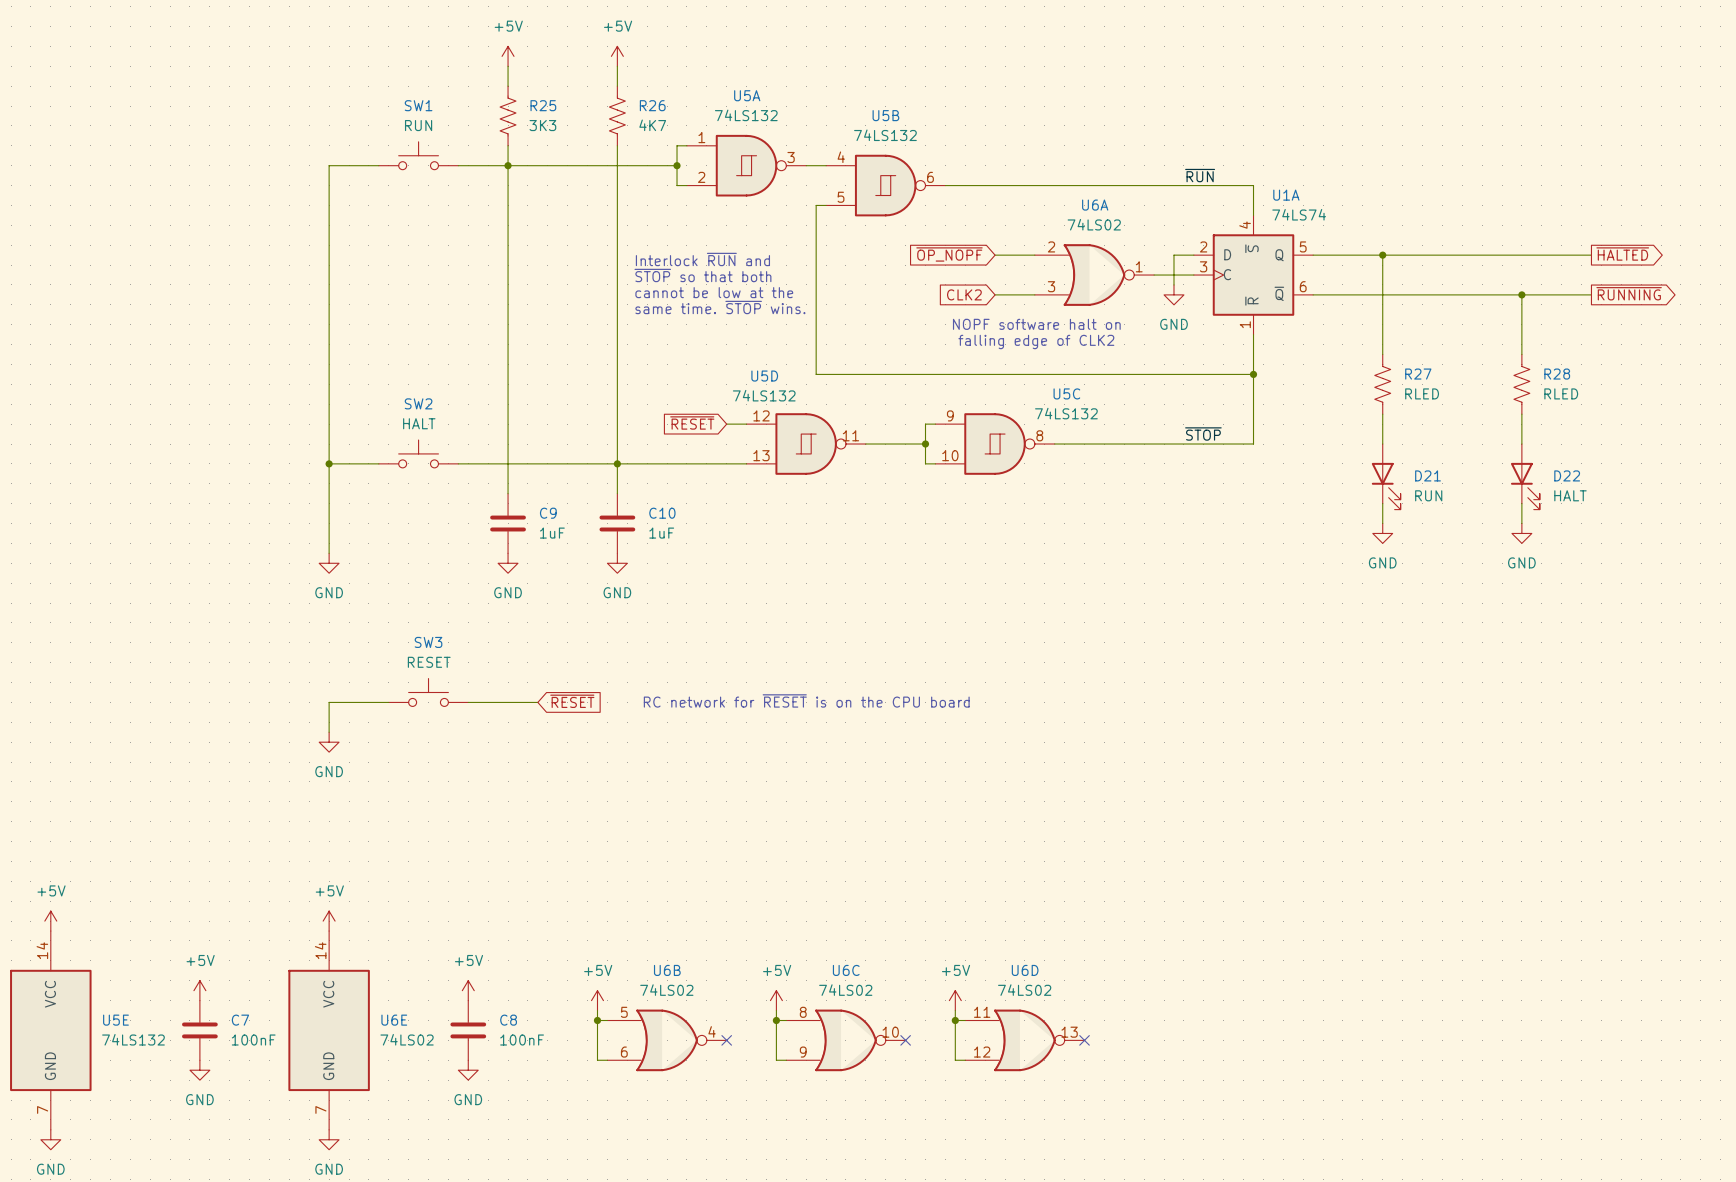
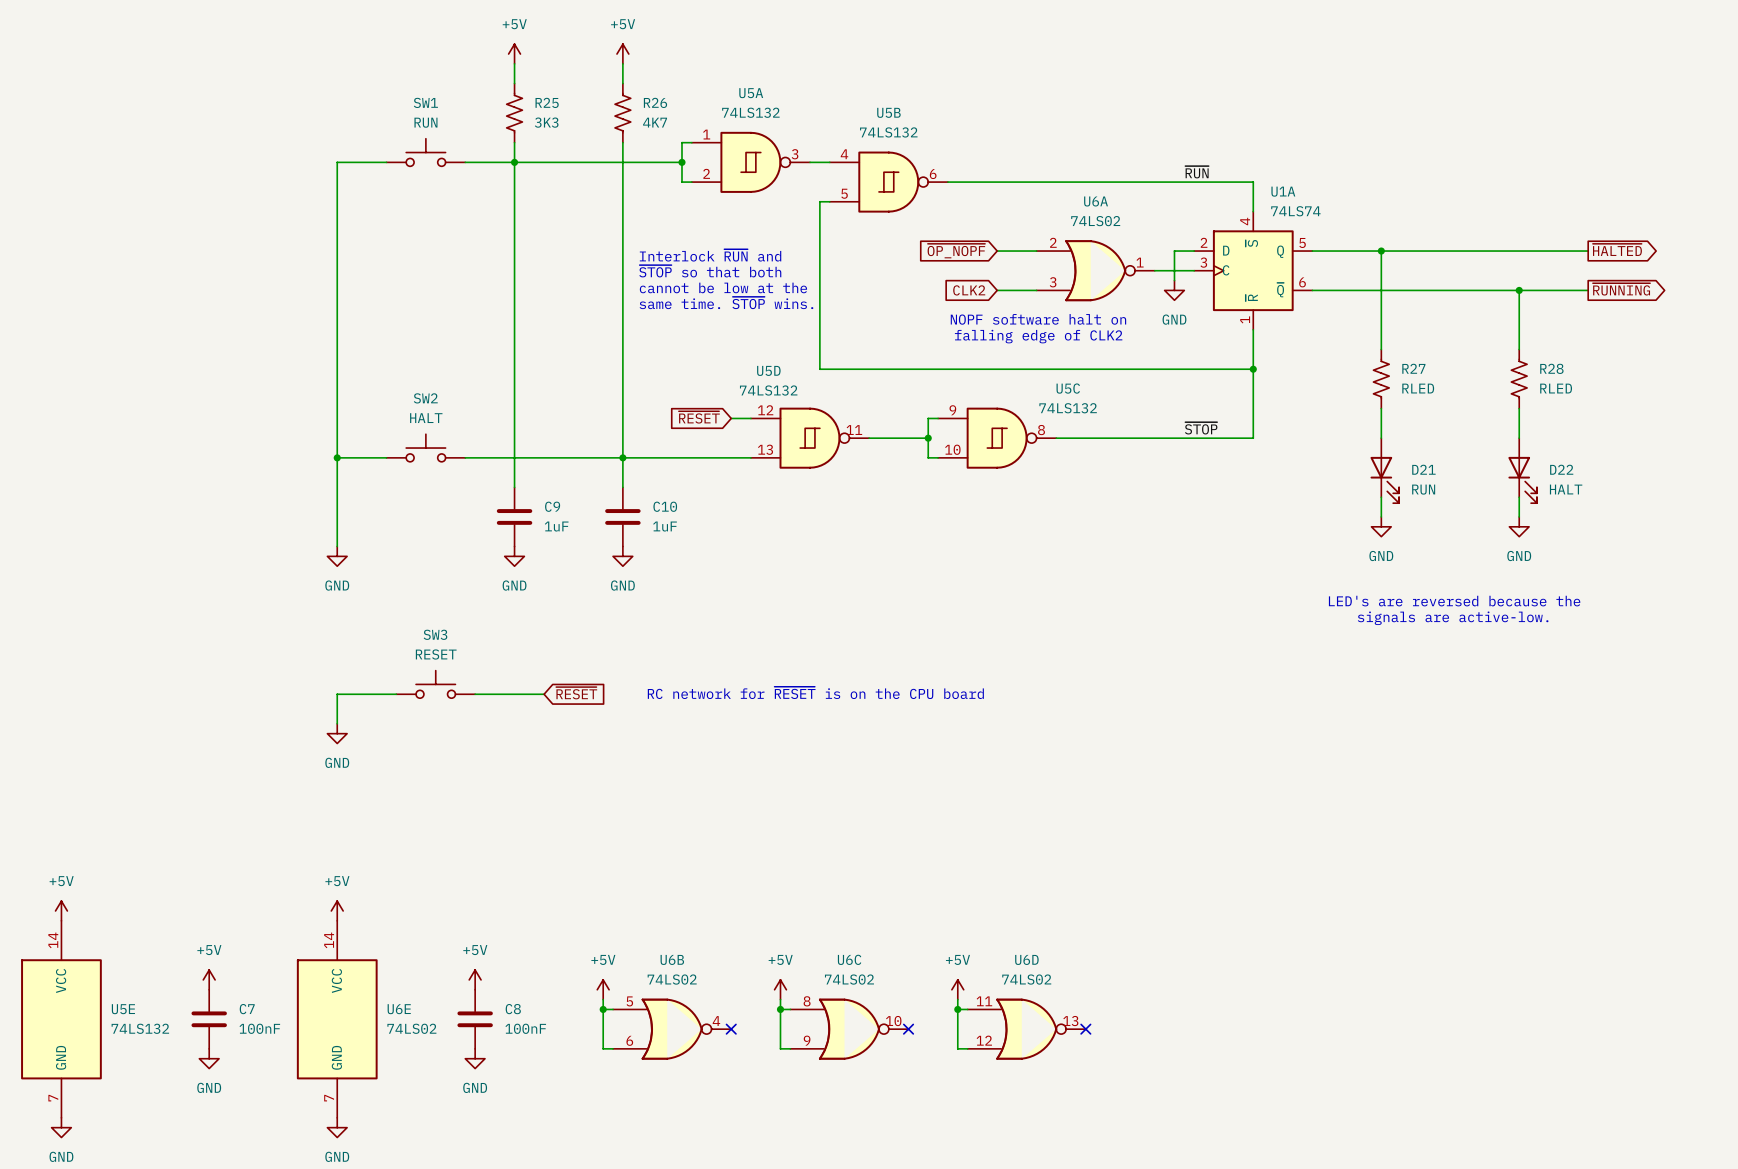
text: none -> LED's are reversed because the (1454, 601)
text: none -> signals are active-low. (1453, 618)

